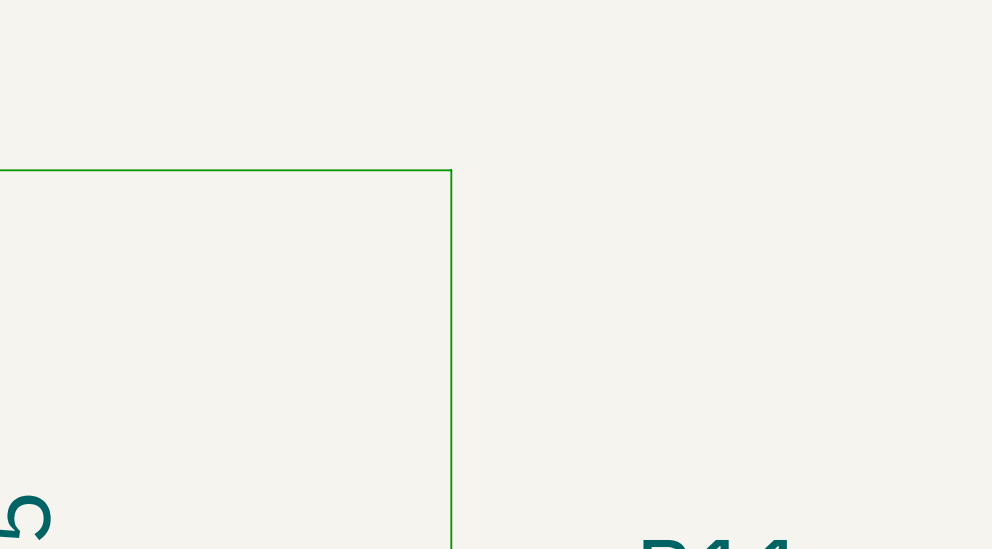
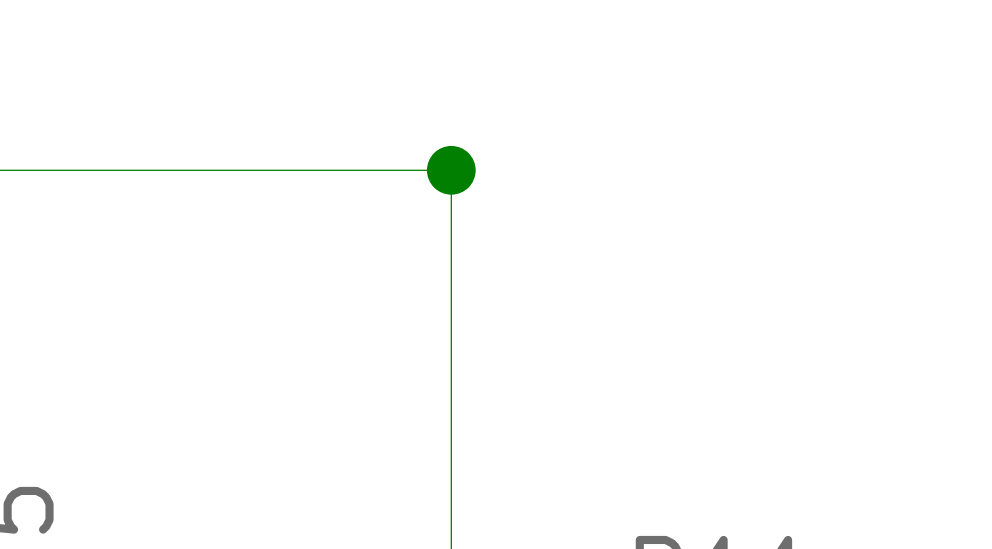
junction: none -> (451, 170)

